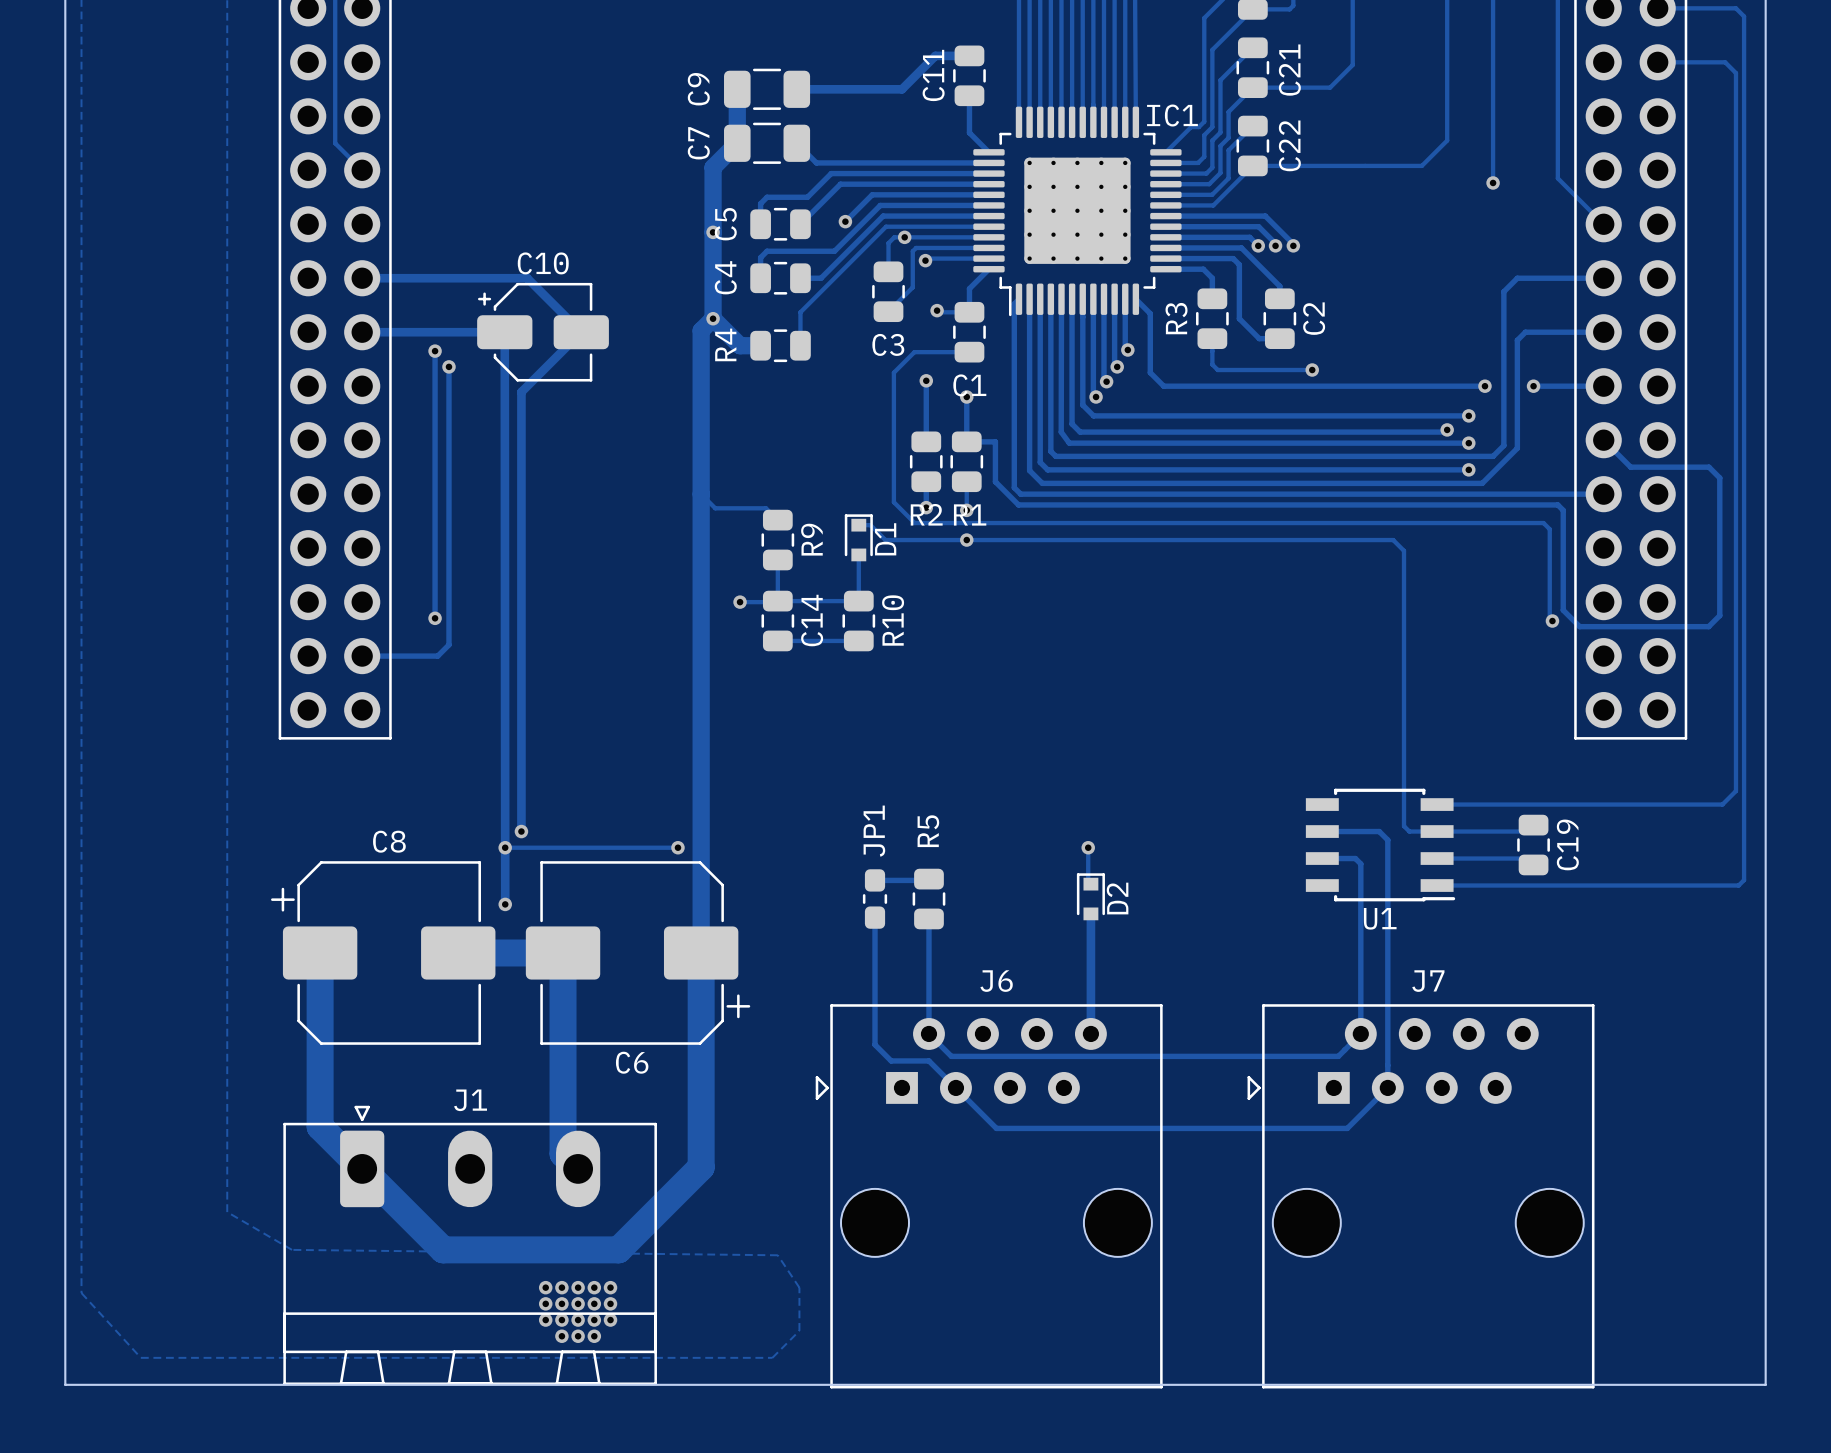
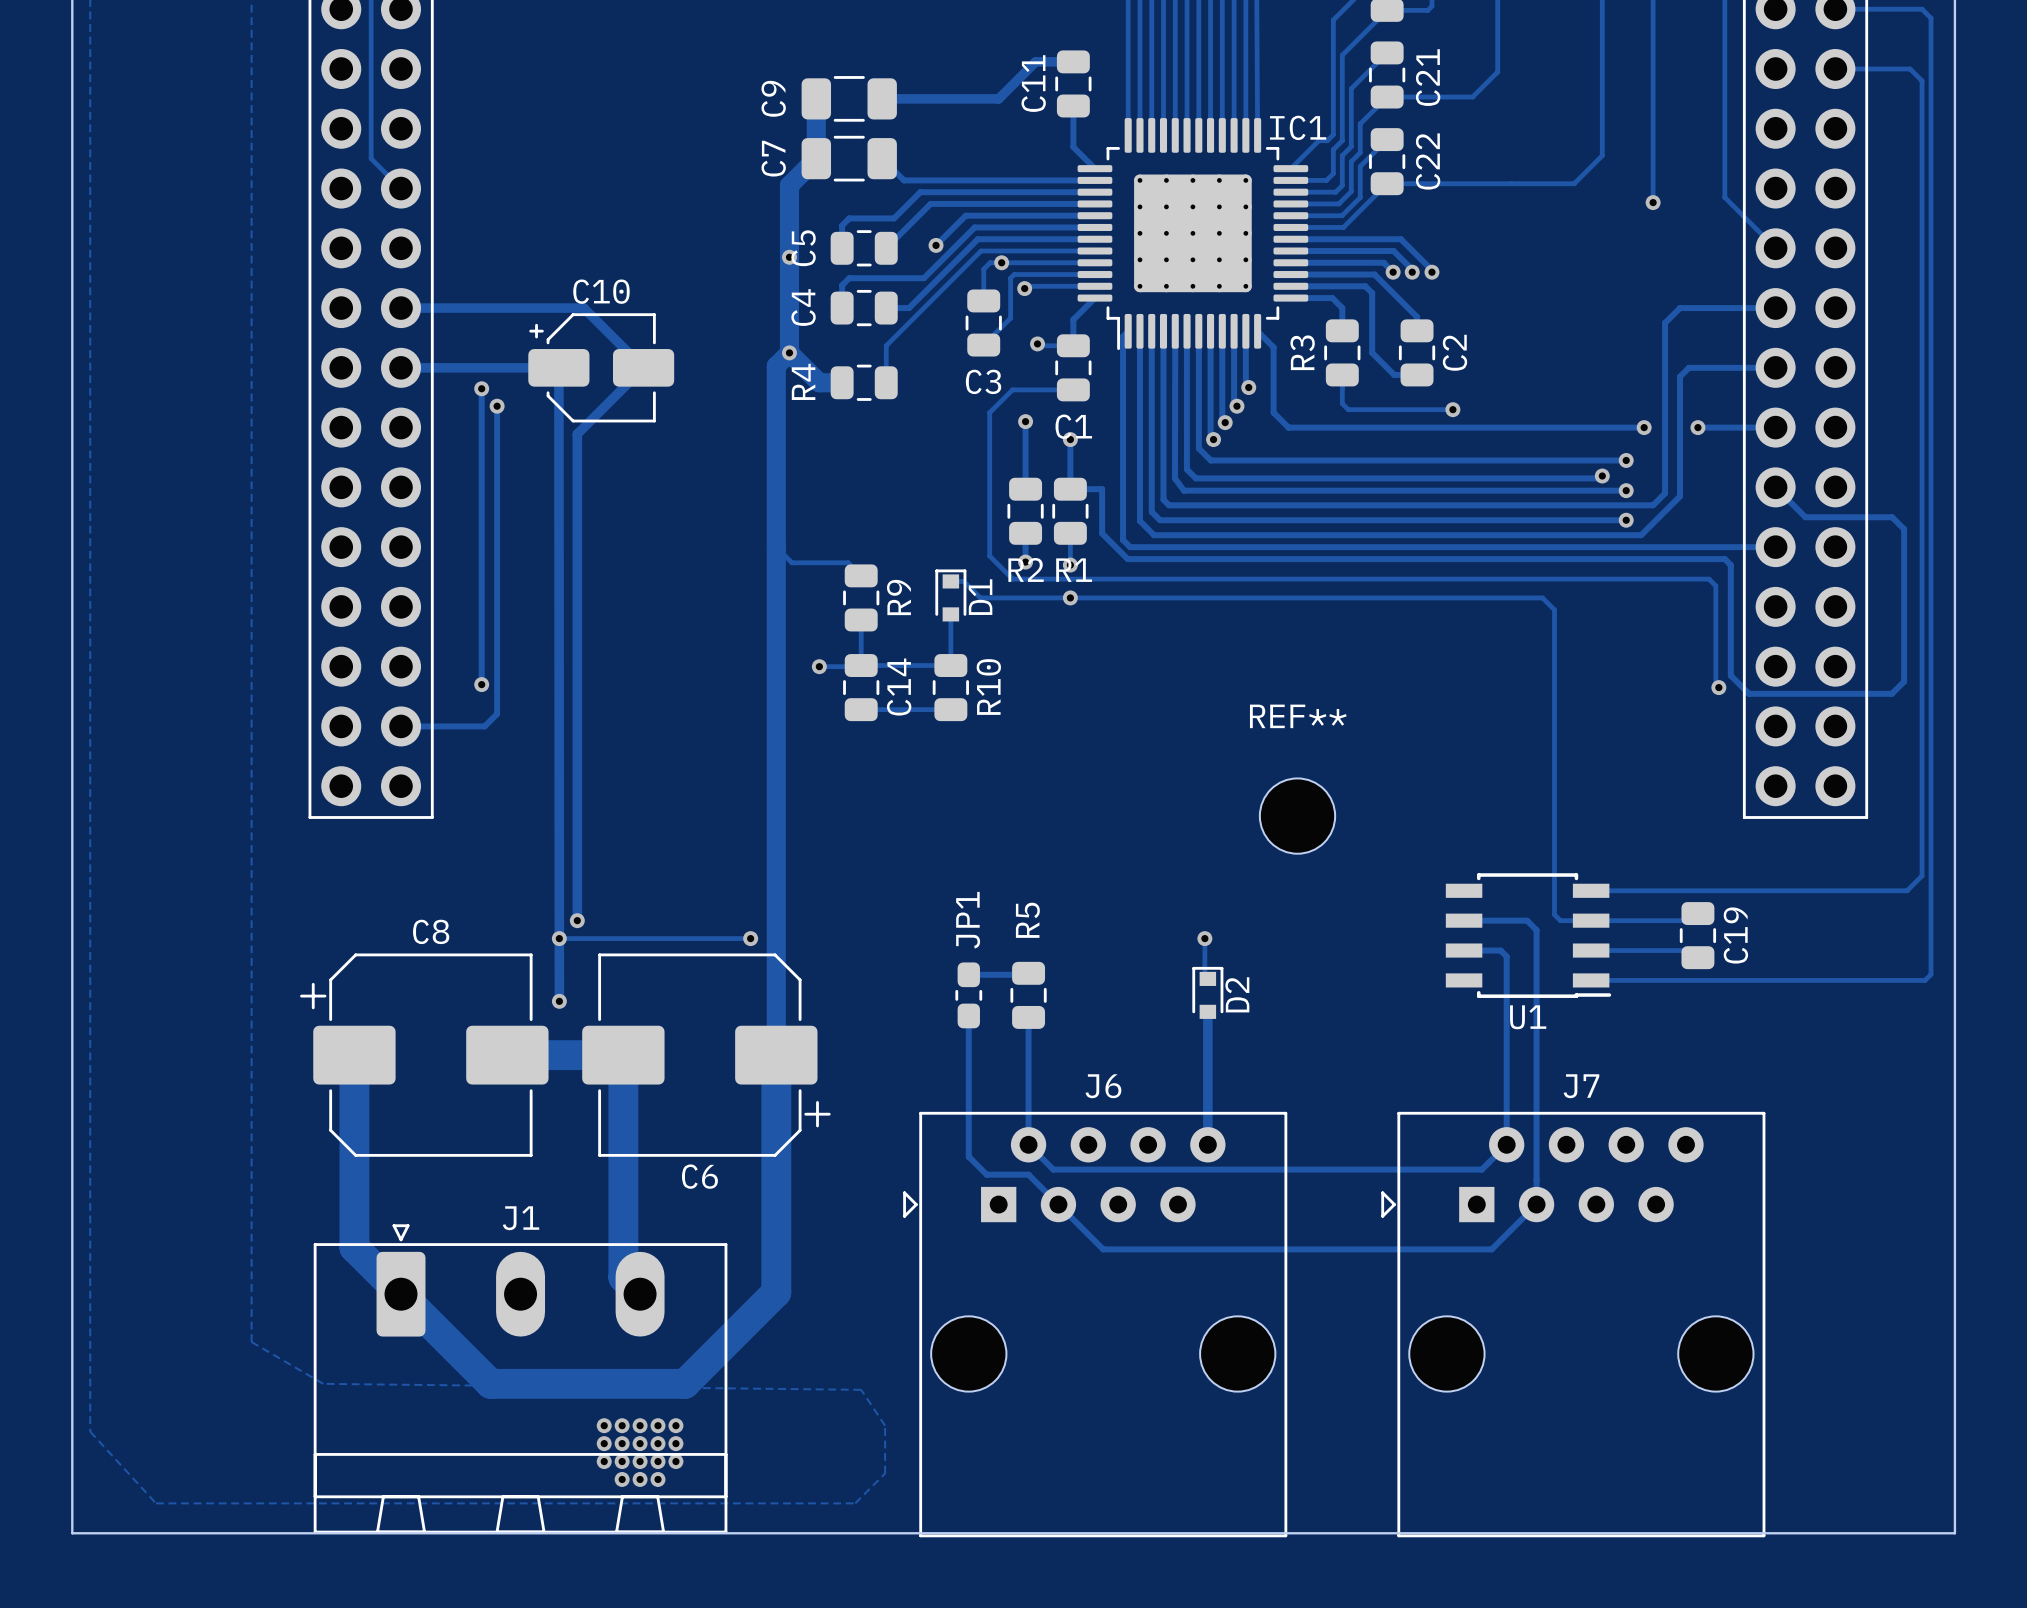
REF**: none -> (1297, 816)

